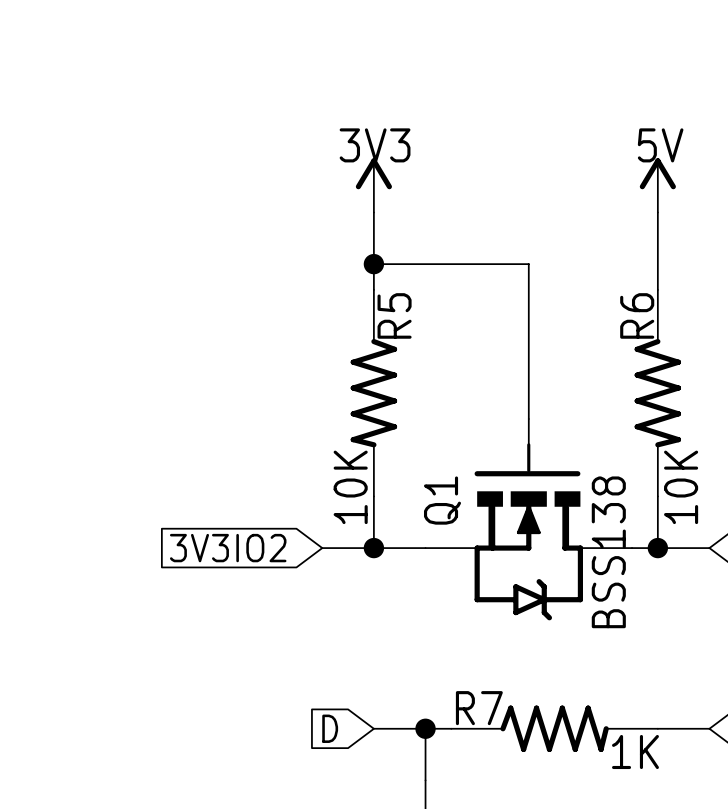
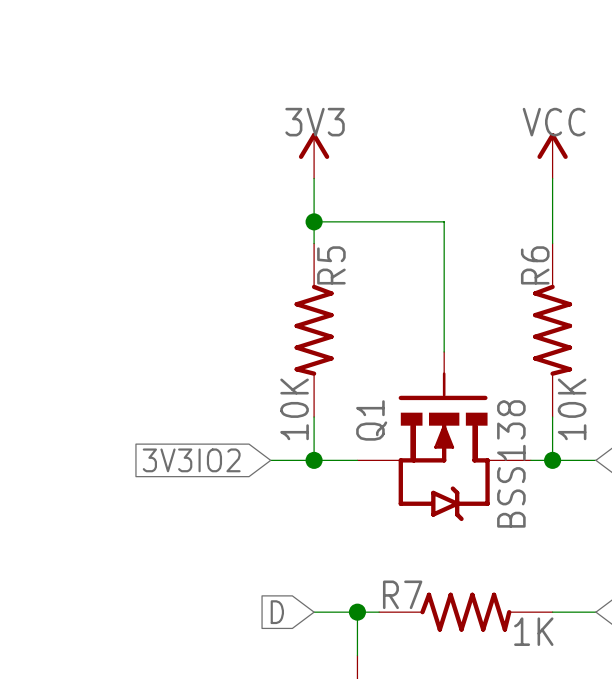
power symbol text: none -> VCC (554, 122)
power symbol text: 5V (660, 145) -> none

